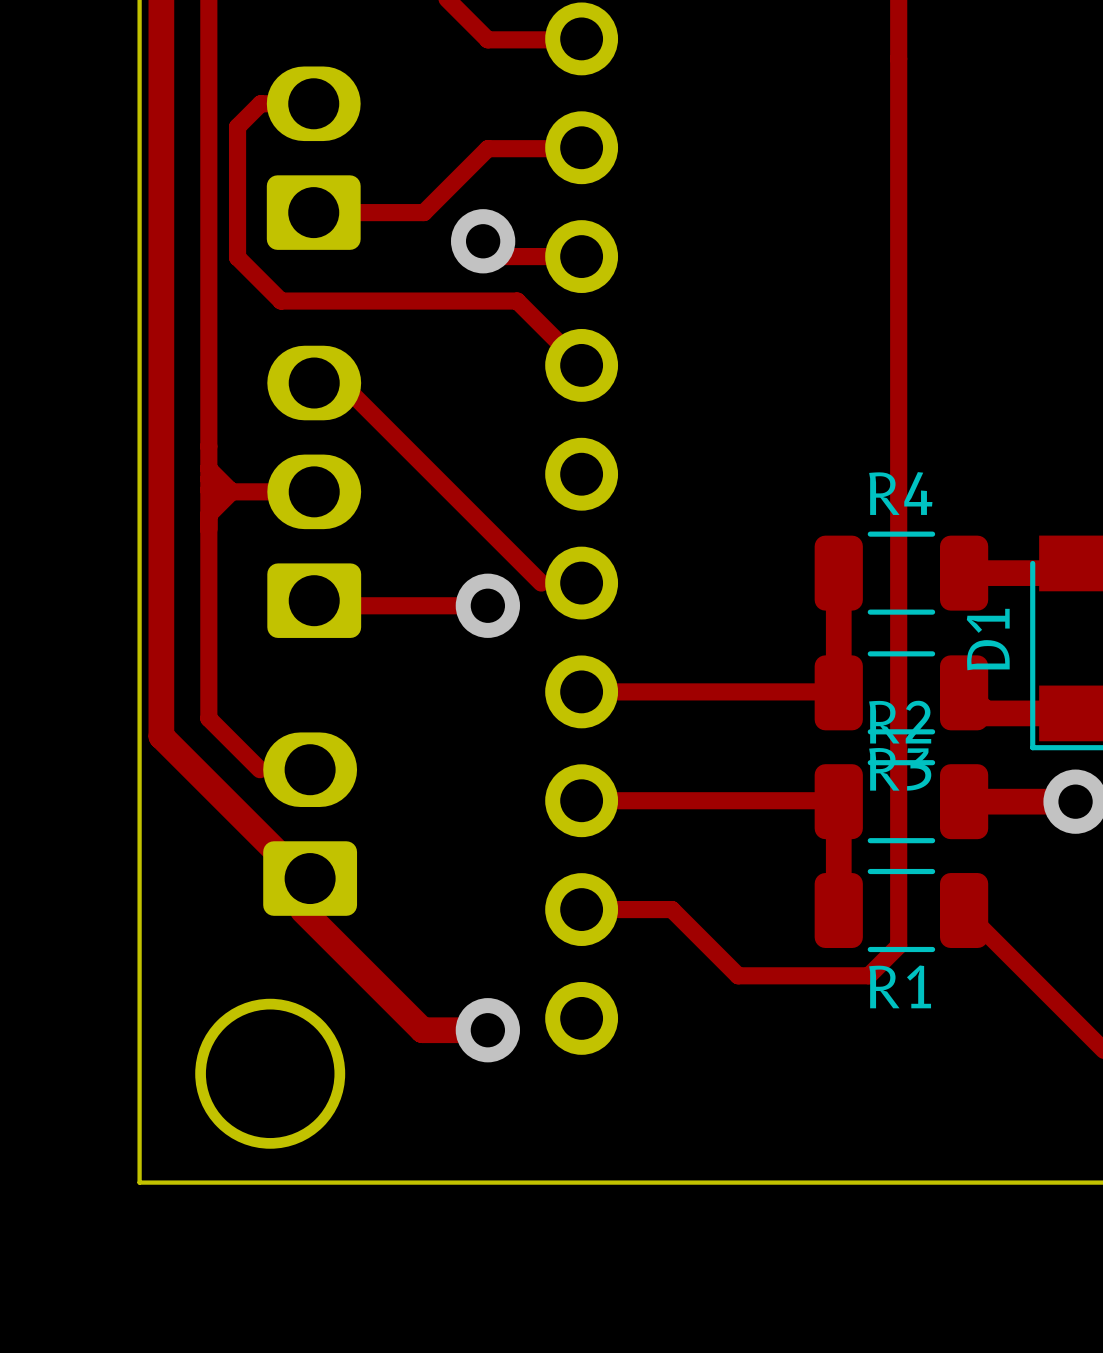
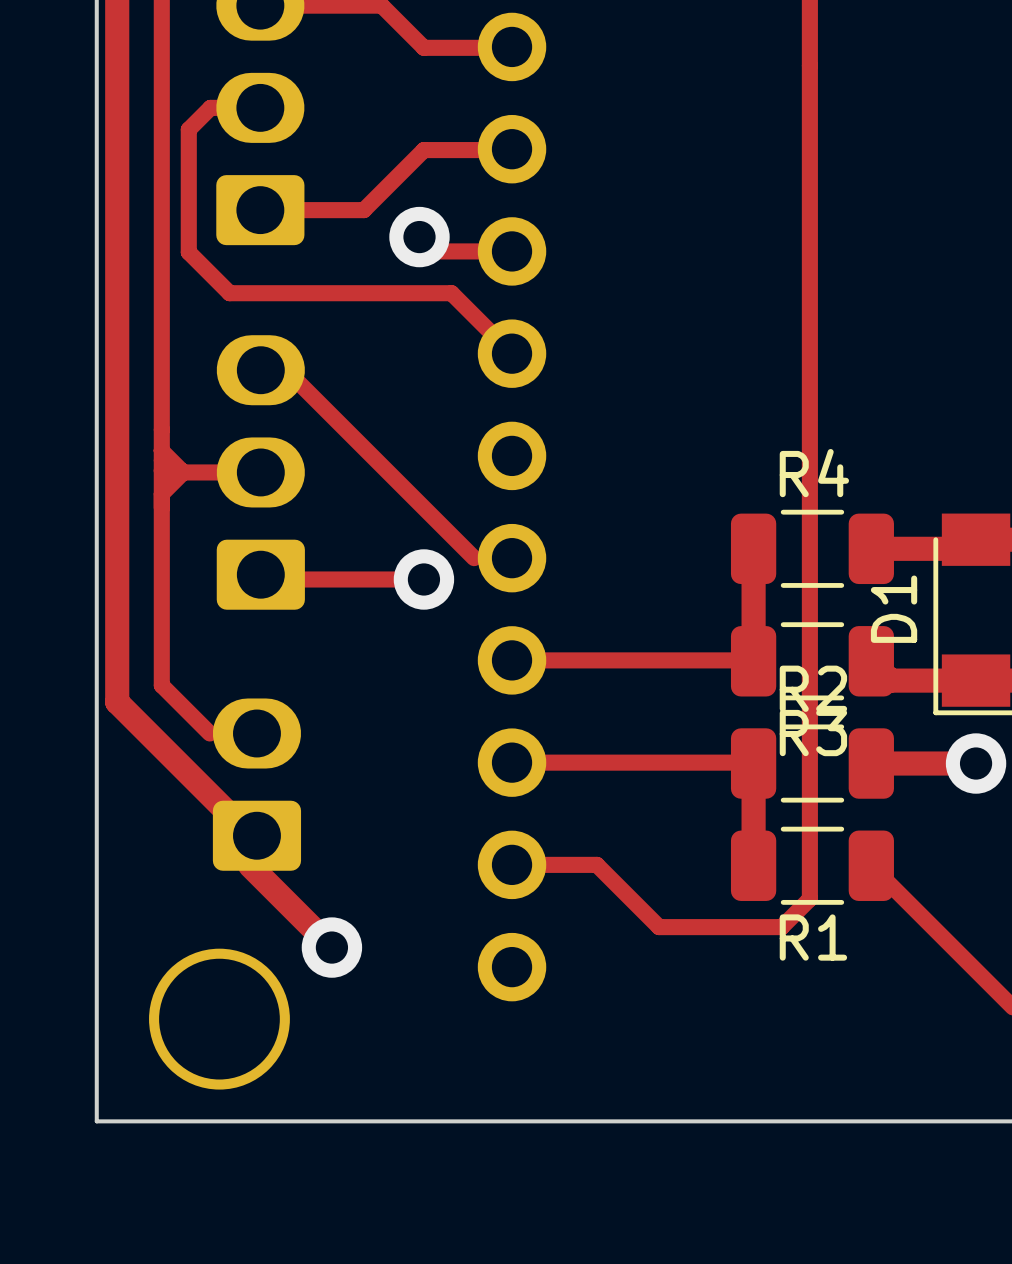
track: (389, 997) (422, 1030) (487, 1030) -> none
via position: (487, 1030) -> (331, 947)

